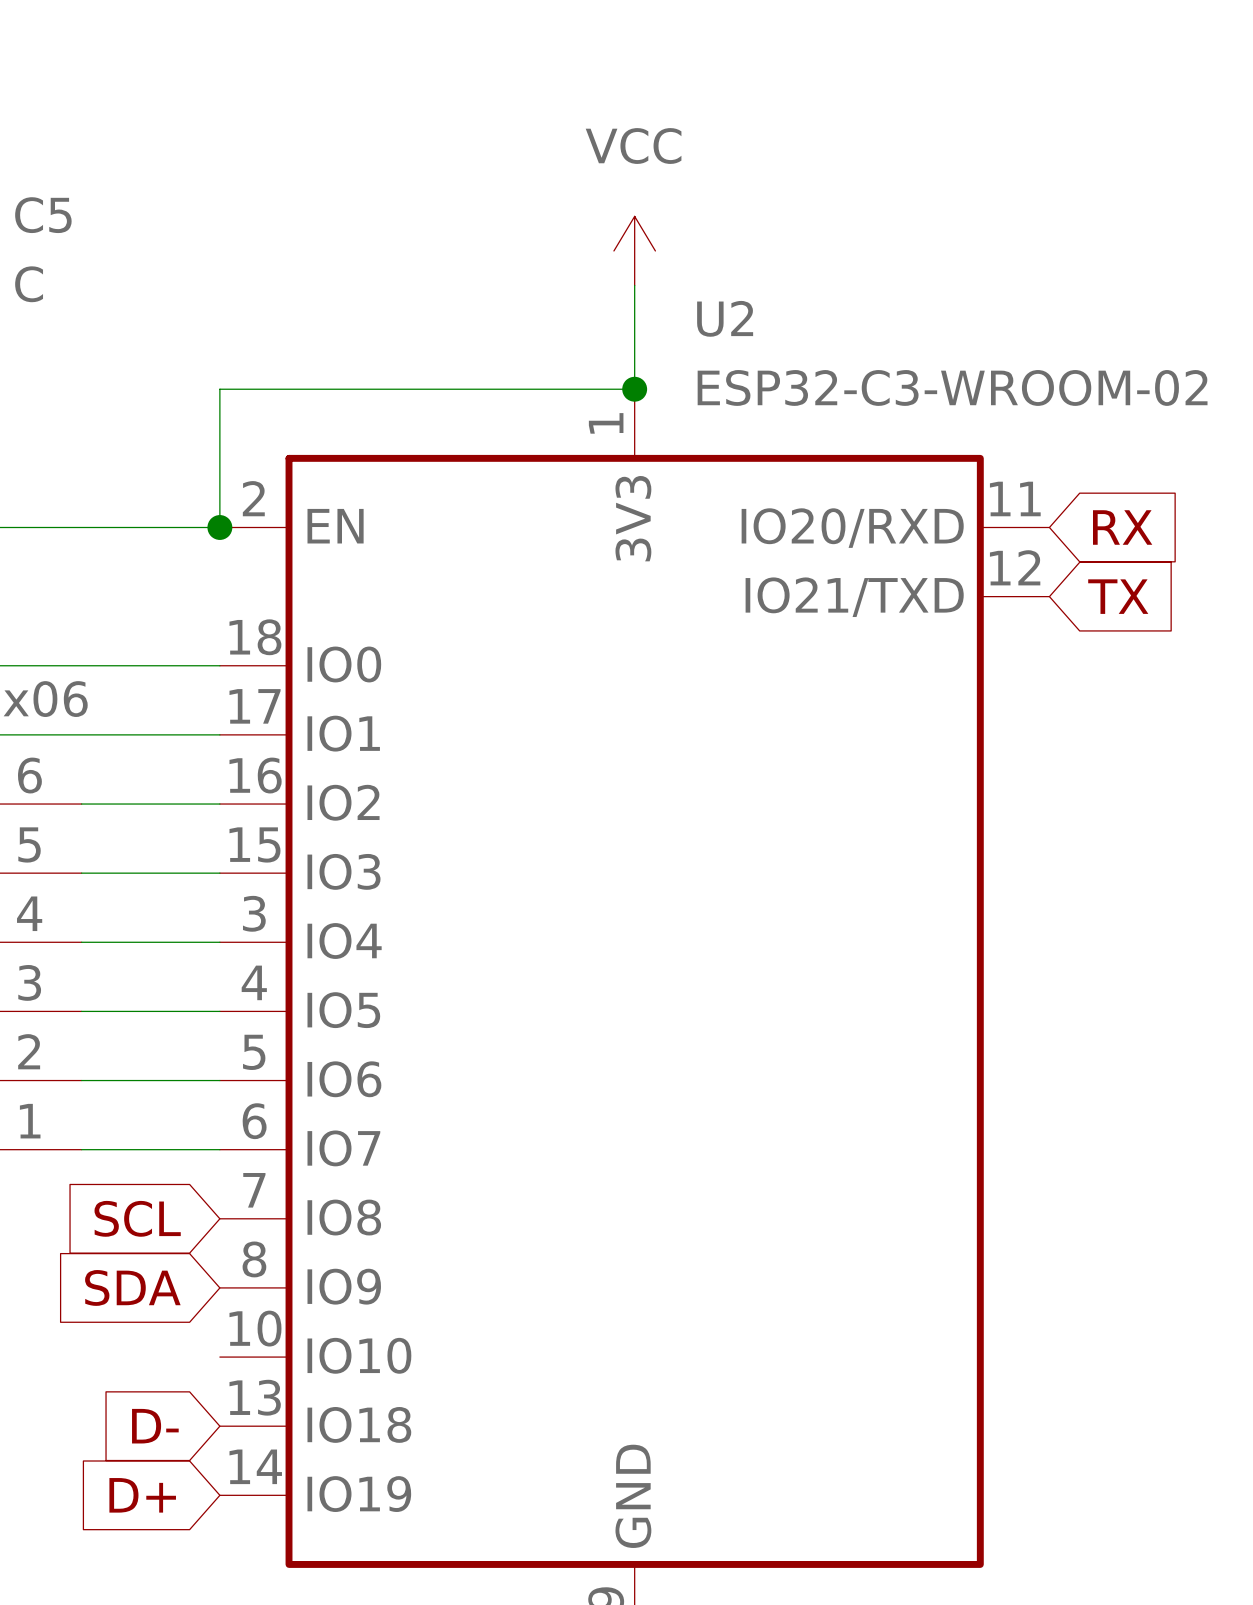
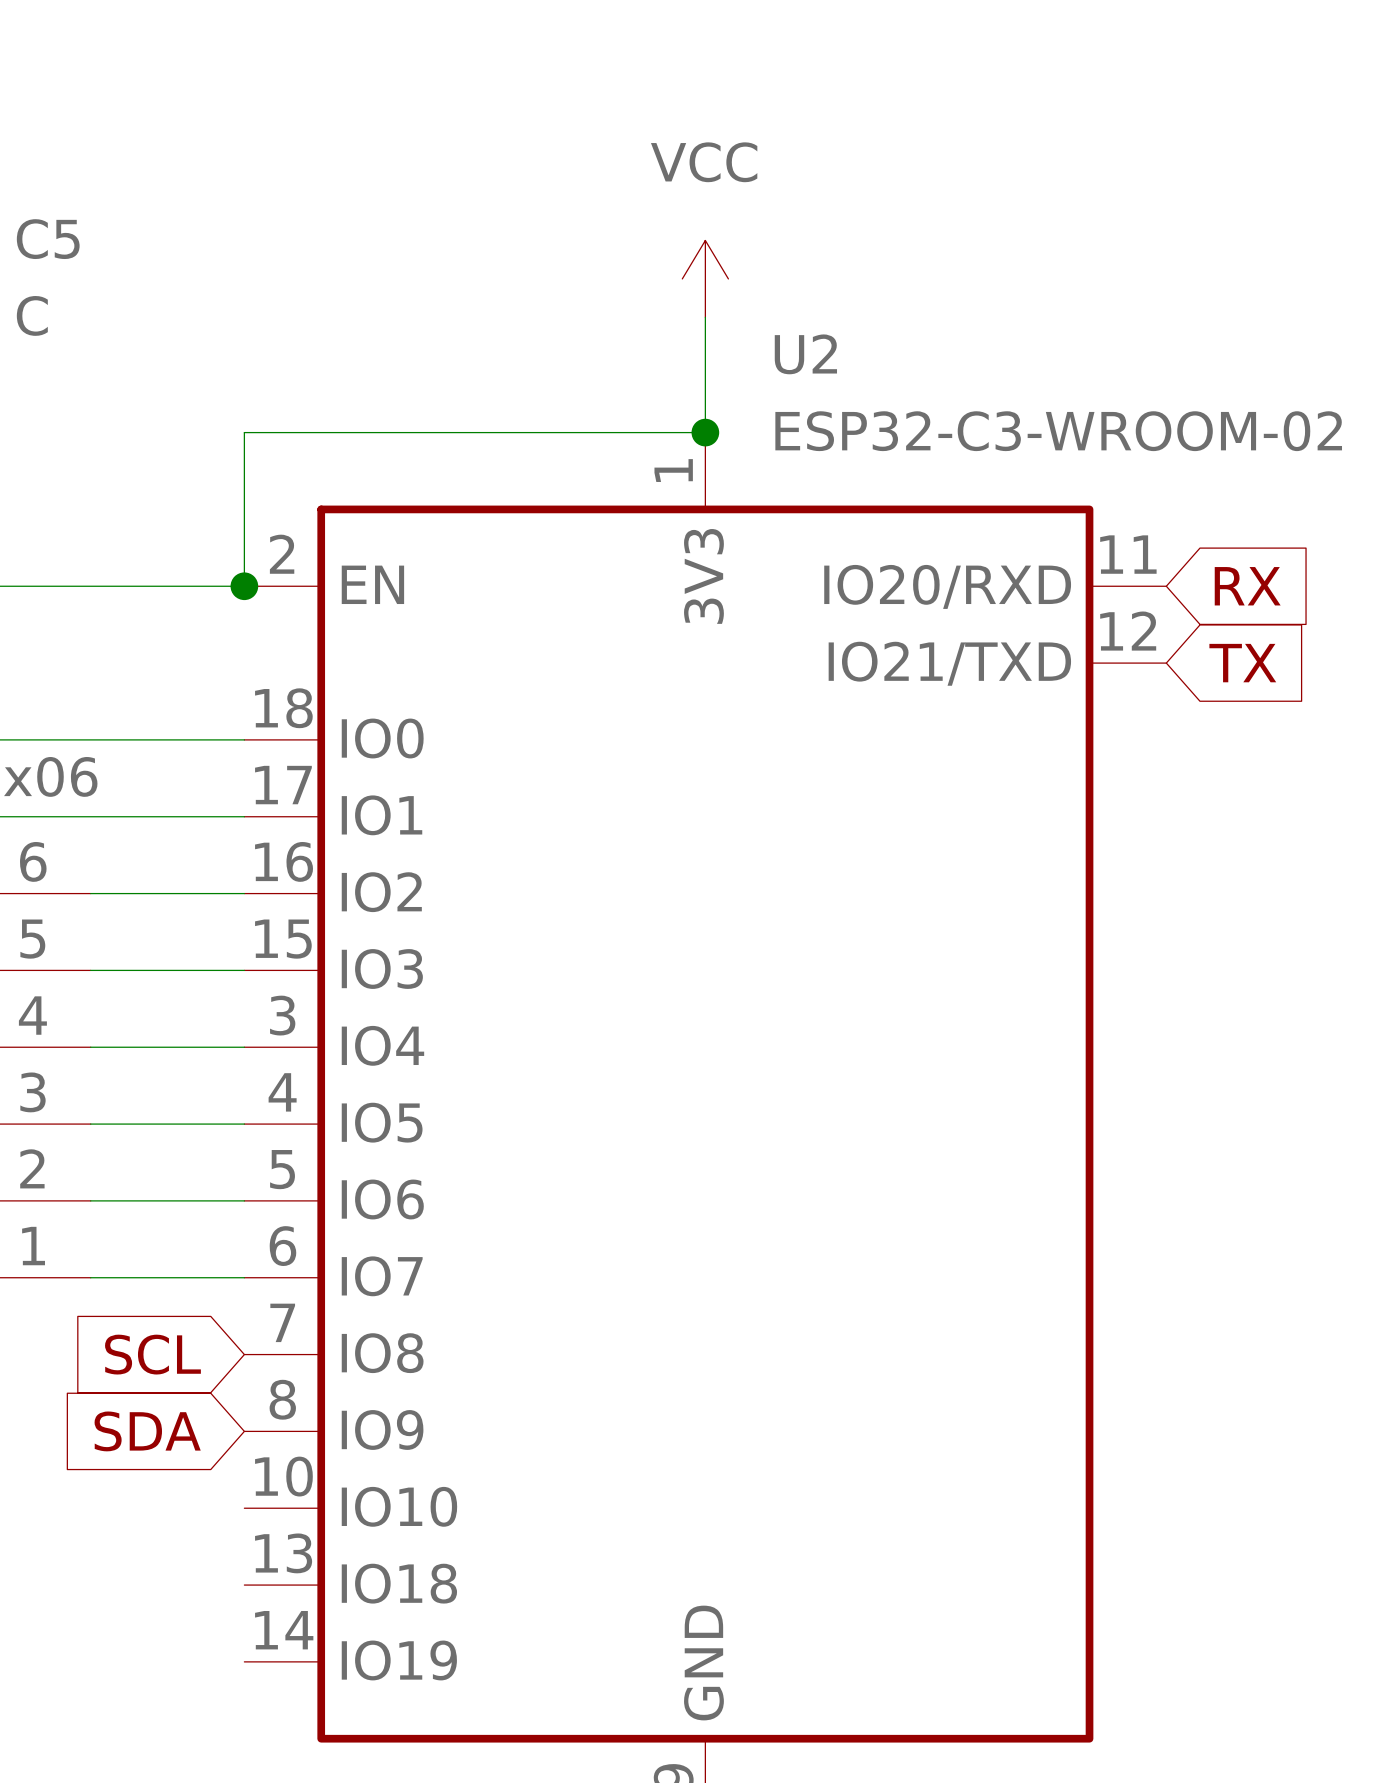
global label: D- (155, 1426) -> none
global label: D+ (142, 1495) -> none

